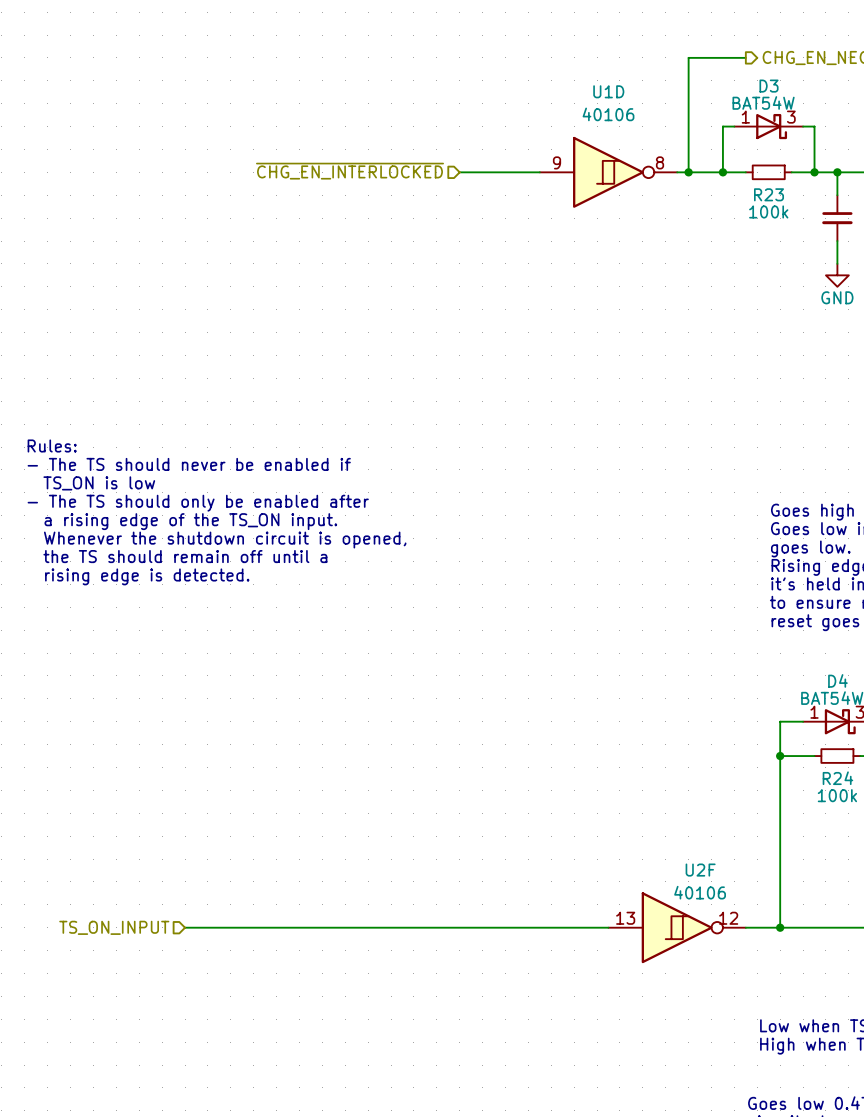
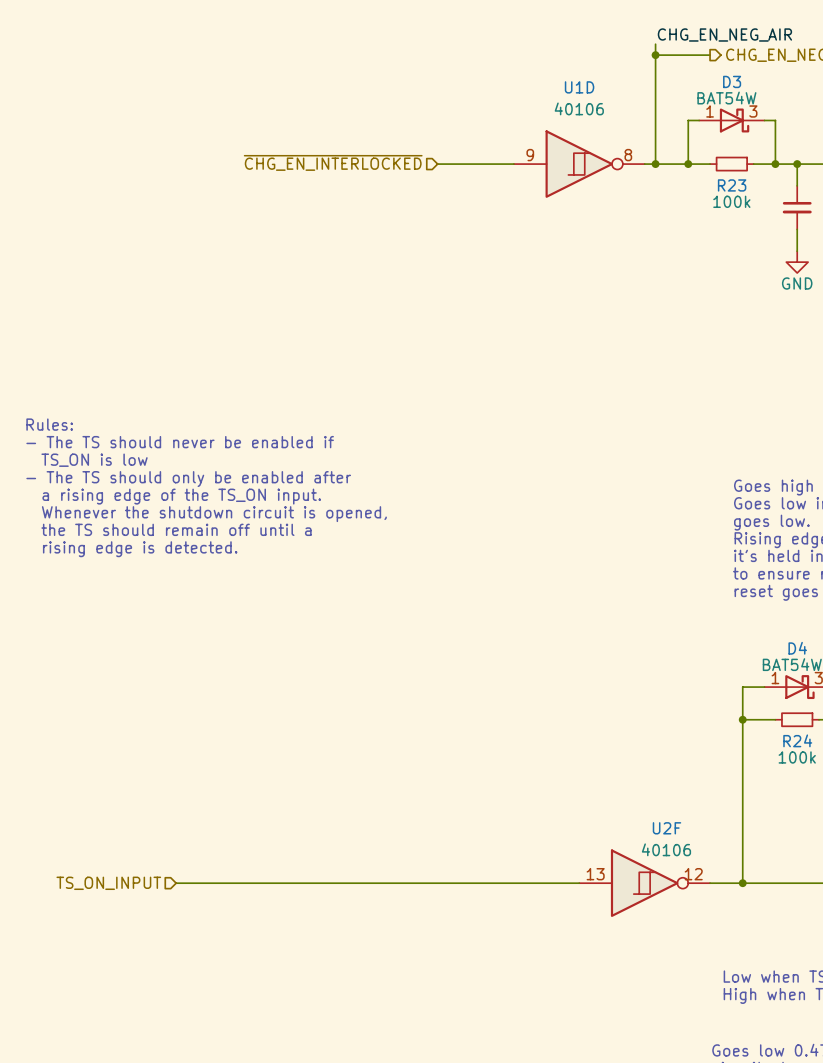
label: none -> CHG_EN_NEG_AIR (724, 35)
wire: none -> (655, 44) (655, 55)
junction: none -> (655, 55)

